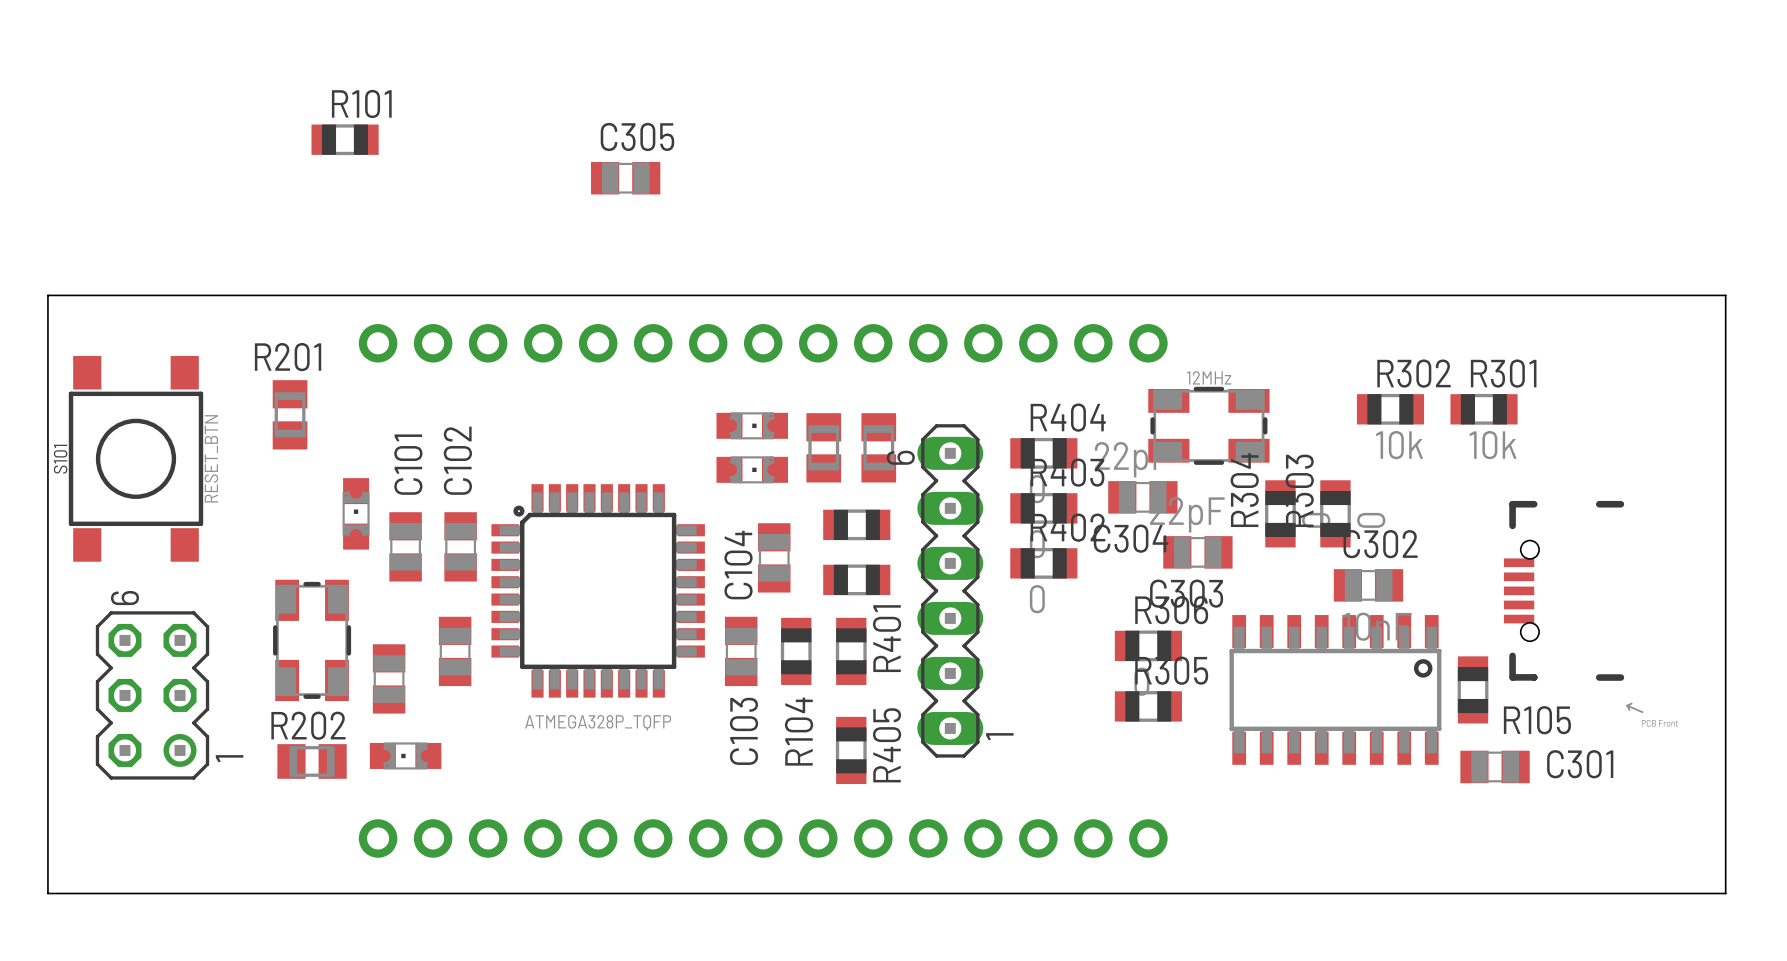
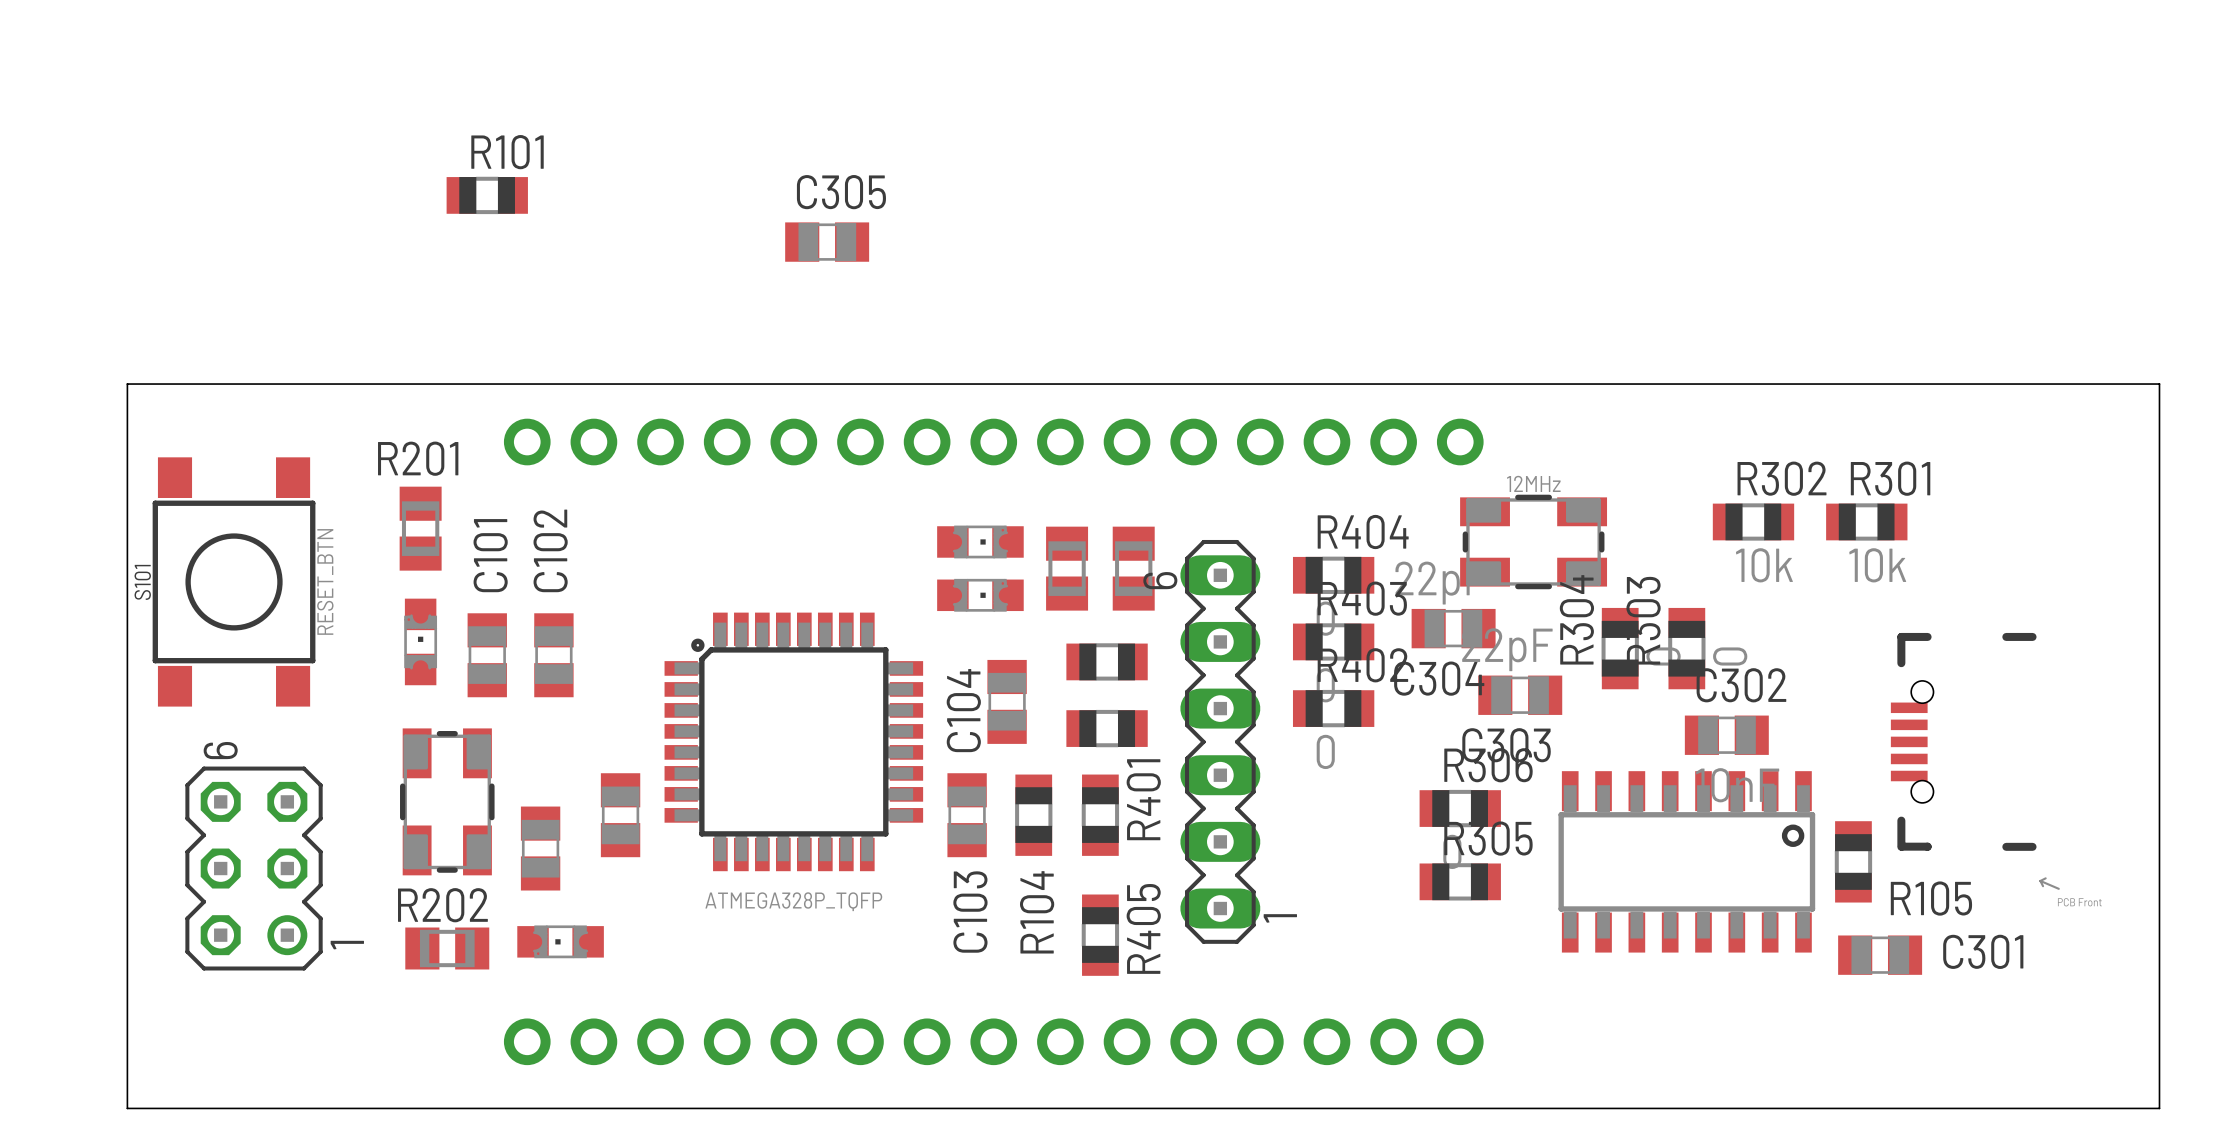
part position: (356, 513) -> (420, 641)
C101 position: (405, 546) -> (487, 655)
C102 position: (460, 546) -> (553, 655)

